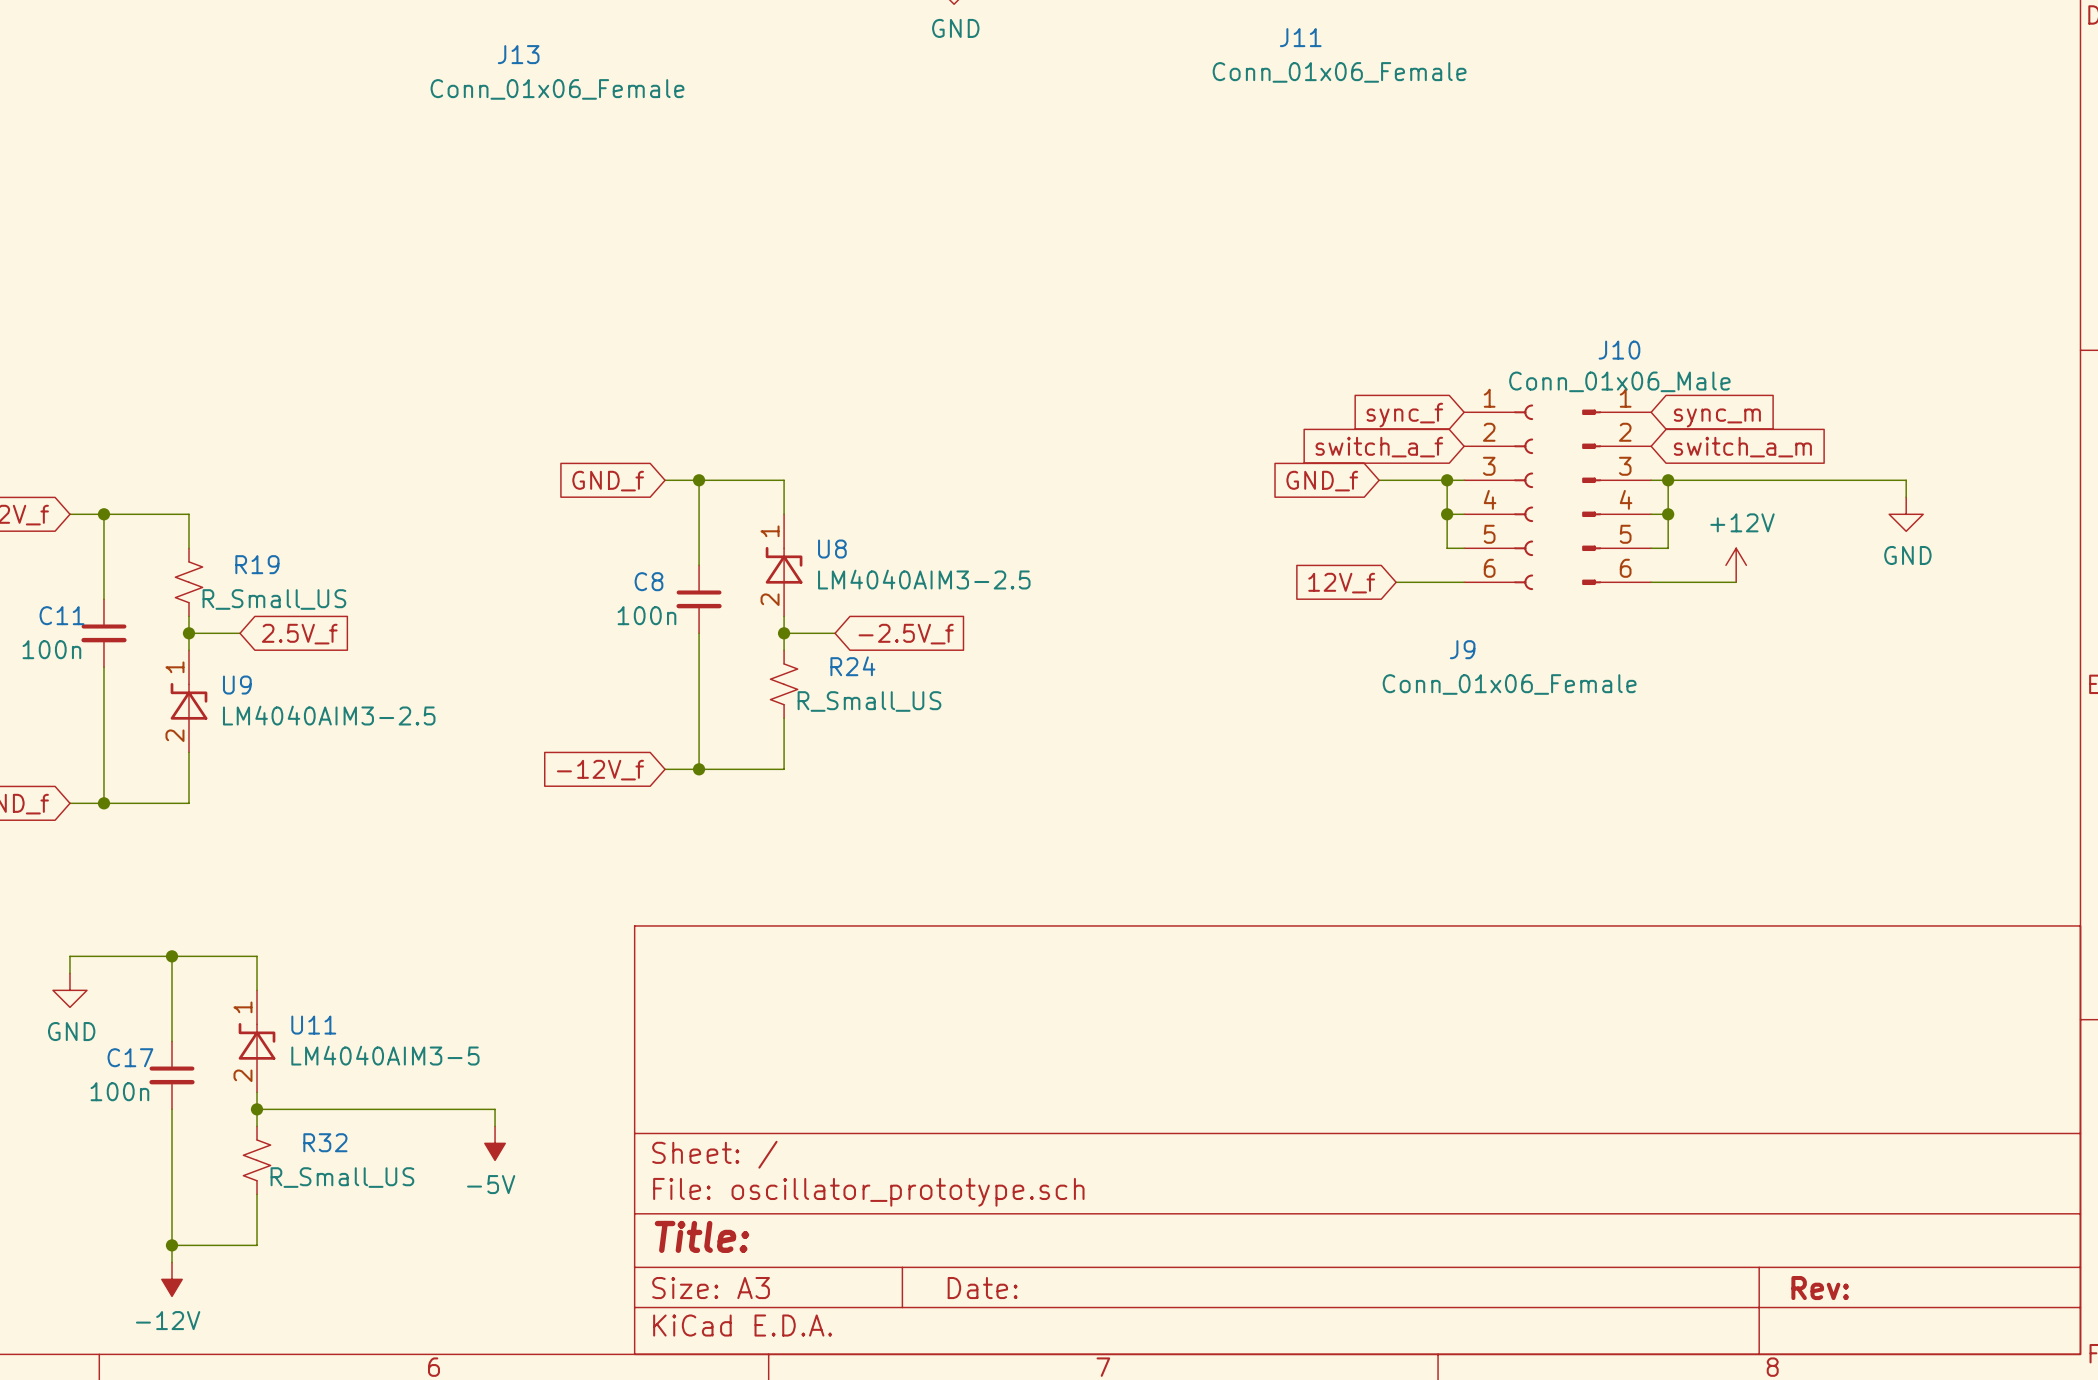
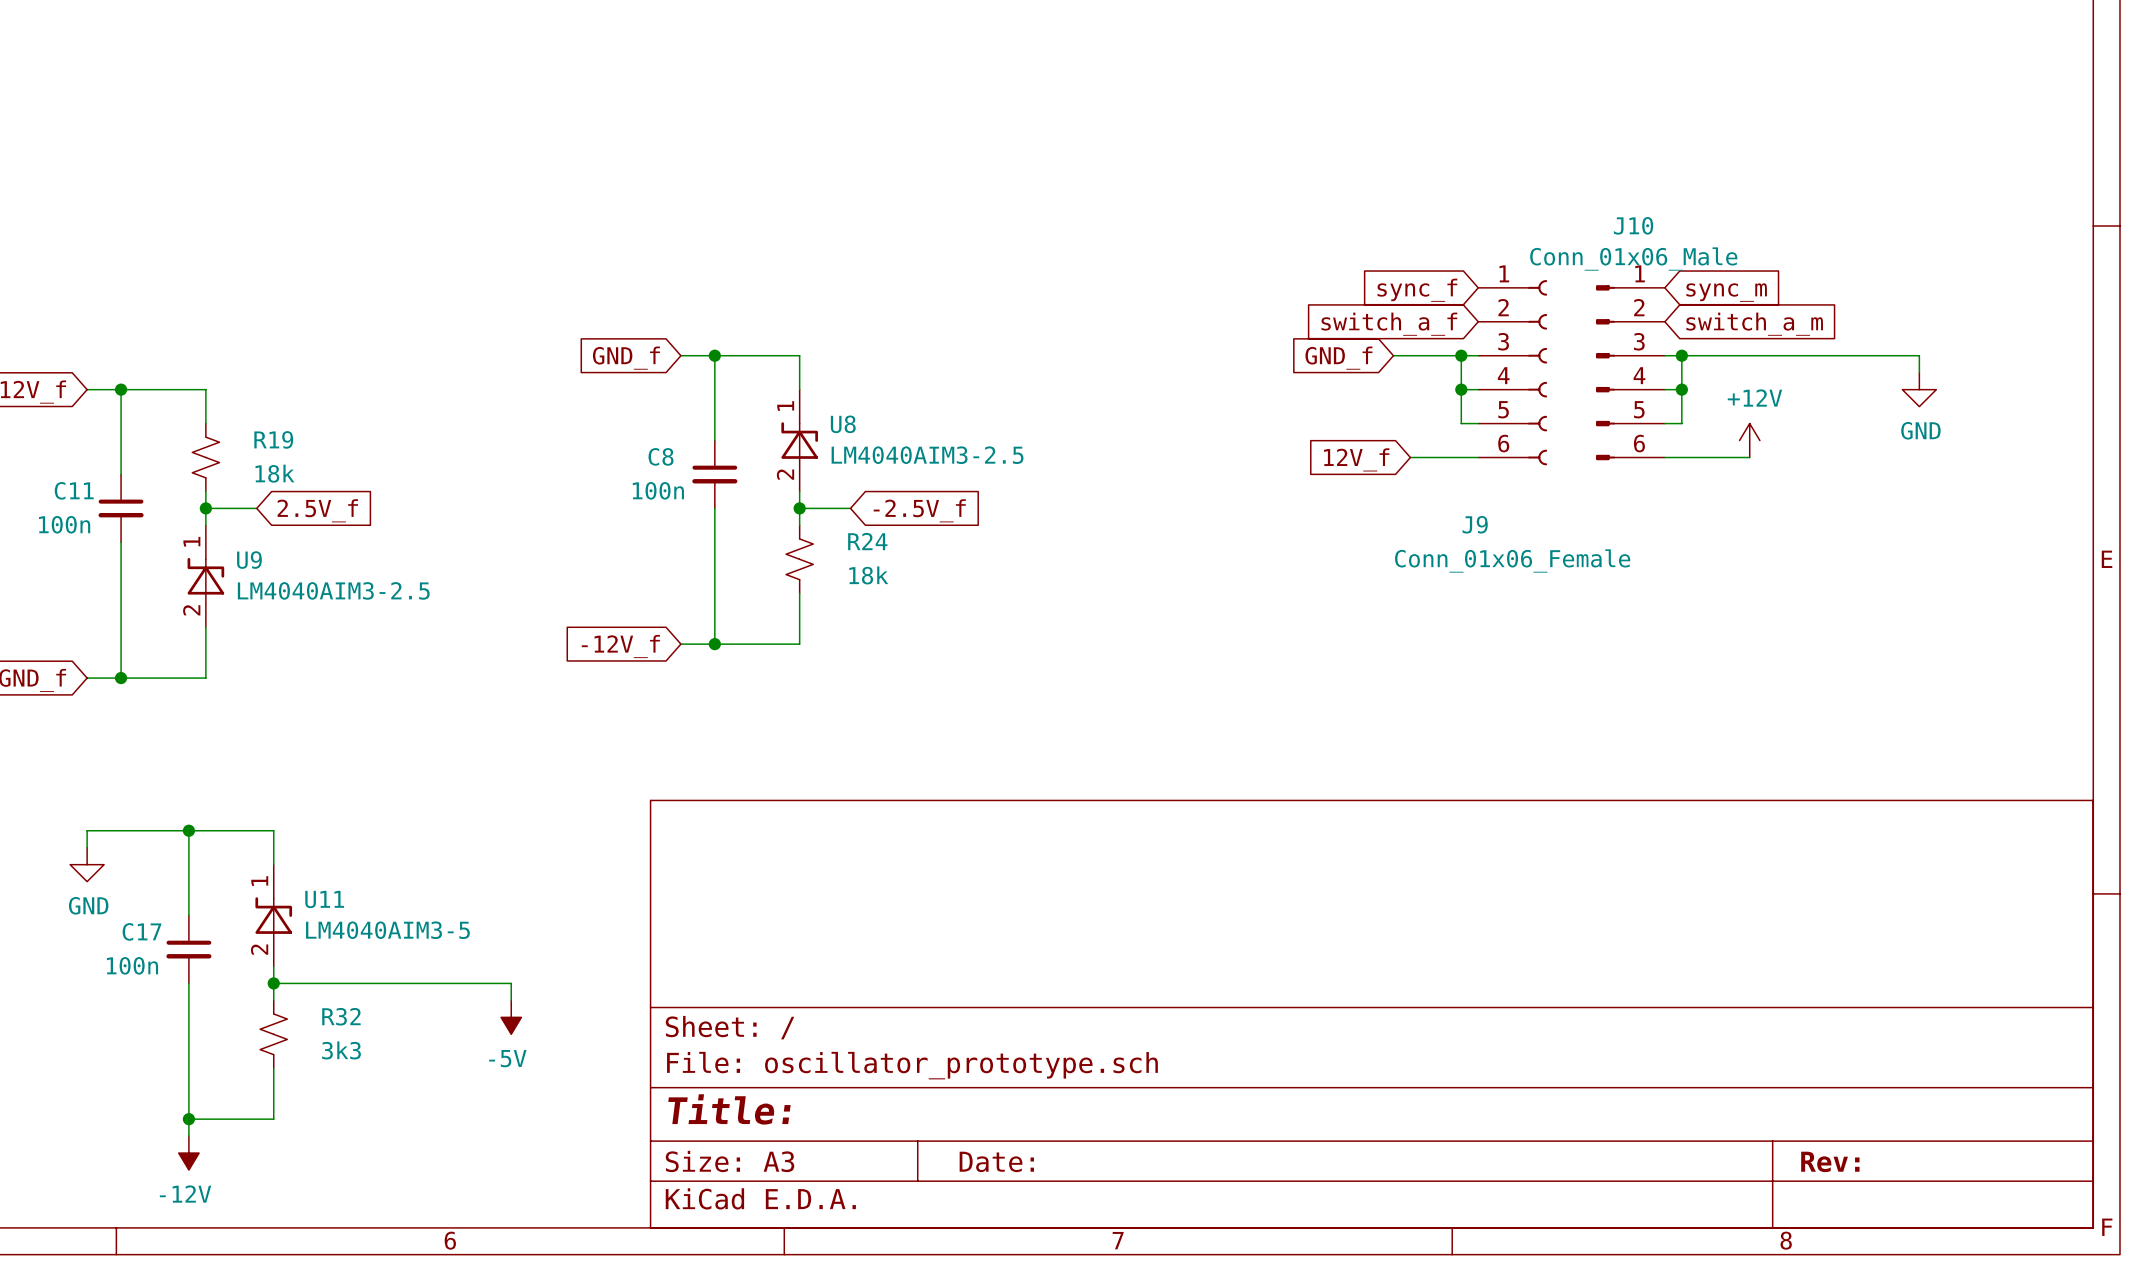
R19 value: R_Small_US (274, 599) -> 18k (274, 473)
R24 value: R_Small_US (869, 701) -> 18k (868, 575)
R32 value: R_Small_US (342, 1177) -> 3k3 (341, 1050)

